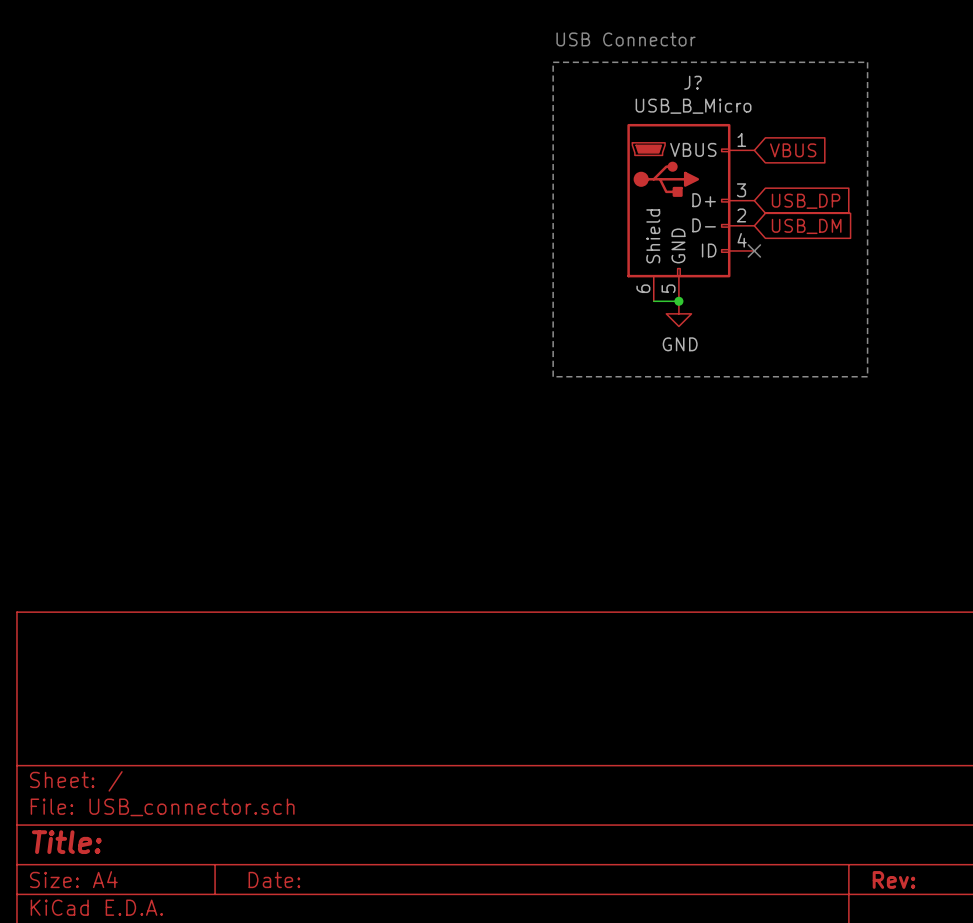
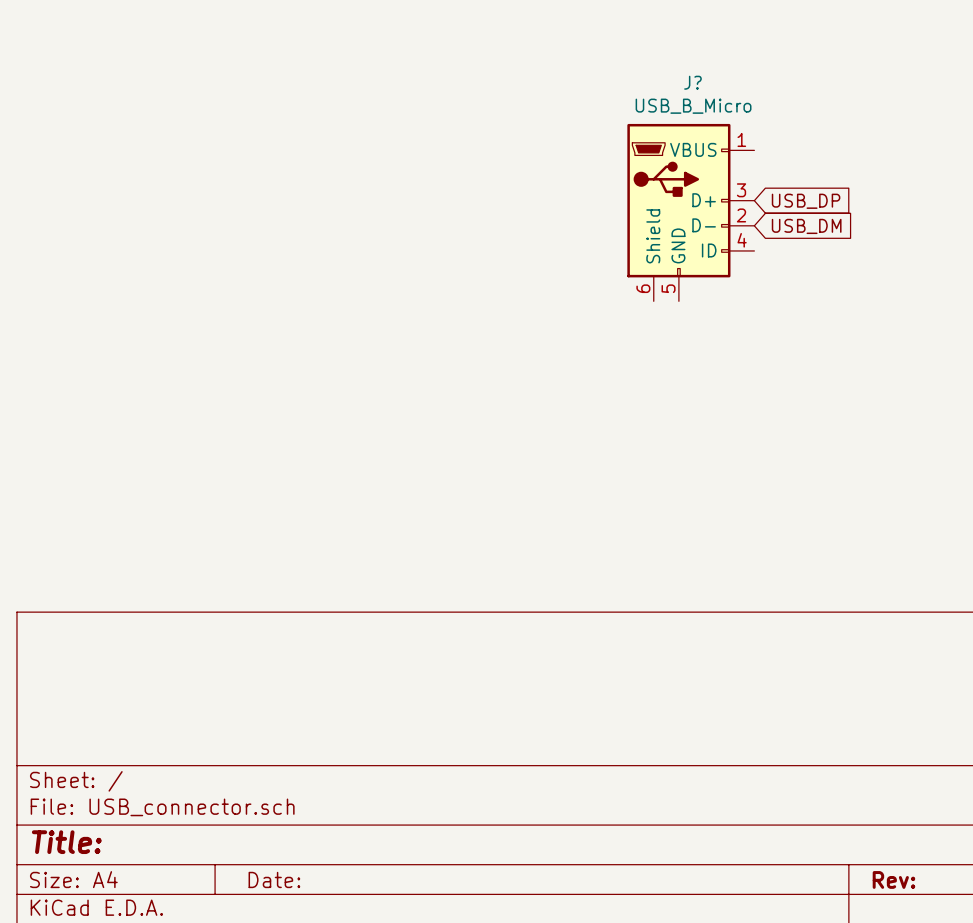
text: USB Connector (626, 39) -> none
line: (553, 62) (867, 62) (867, 376) (553, 376) (553, 62) -> none
global label: VBUS (793, 150) -> none
no-connect mark: (754, 250) -> none
wire: (653, 301) (678, 301) -> none
junction: (678, 301) -> none
power symbol: GND (678, 313) -> none

